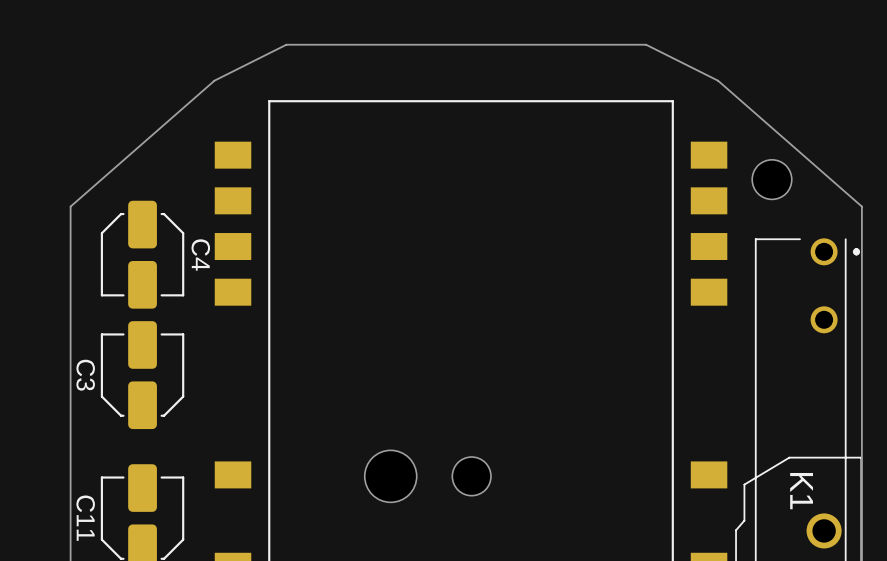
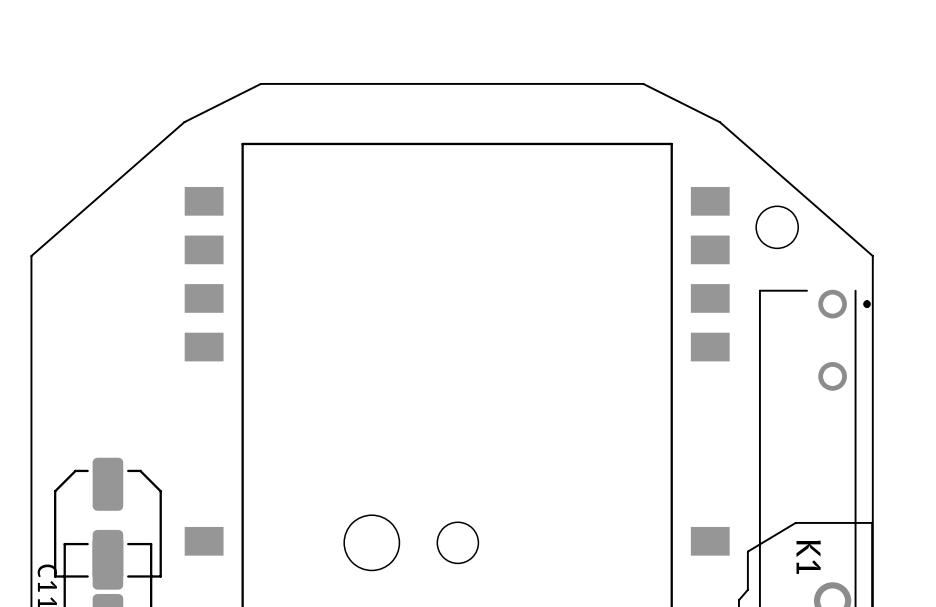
C4: (142, 254) -> none
C3: (142, 375) -> none
part: none -> (107, 523)

